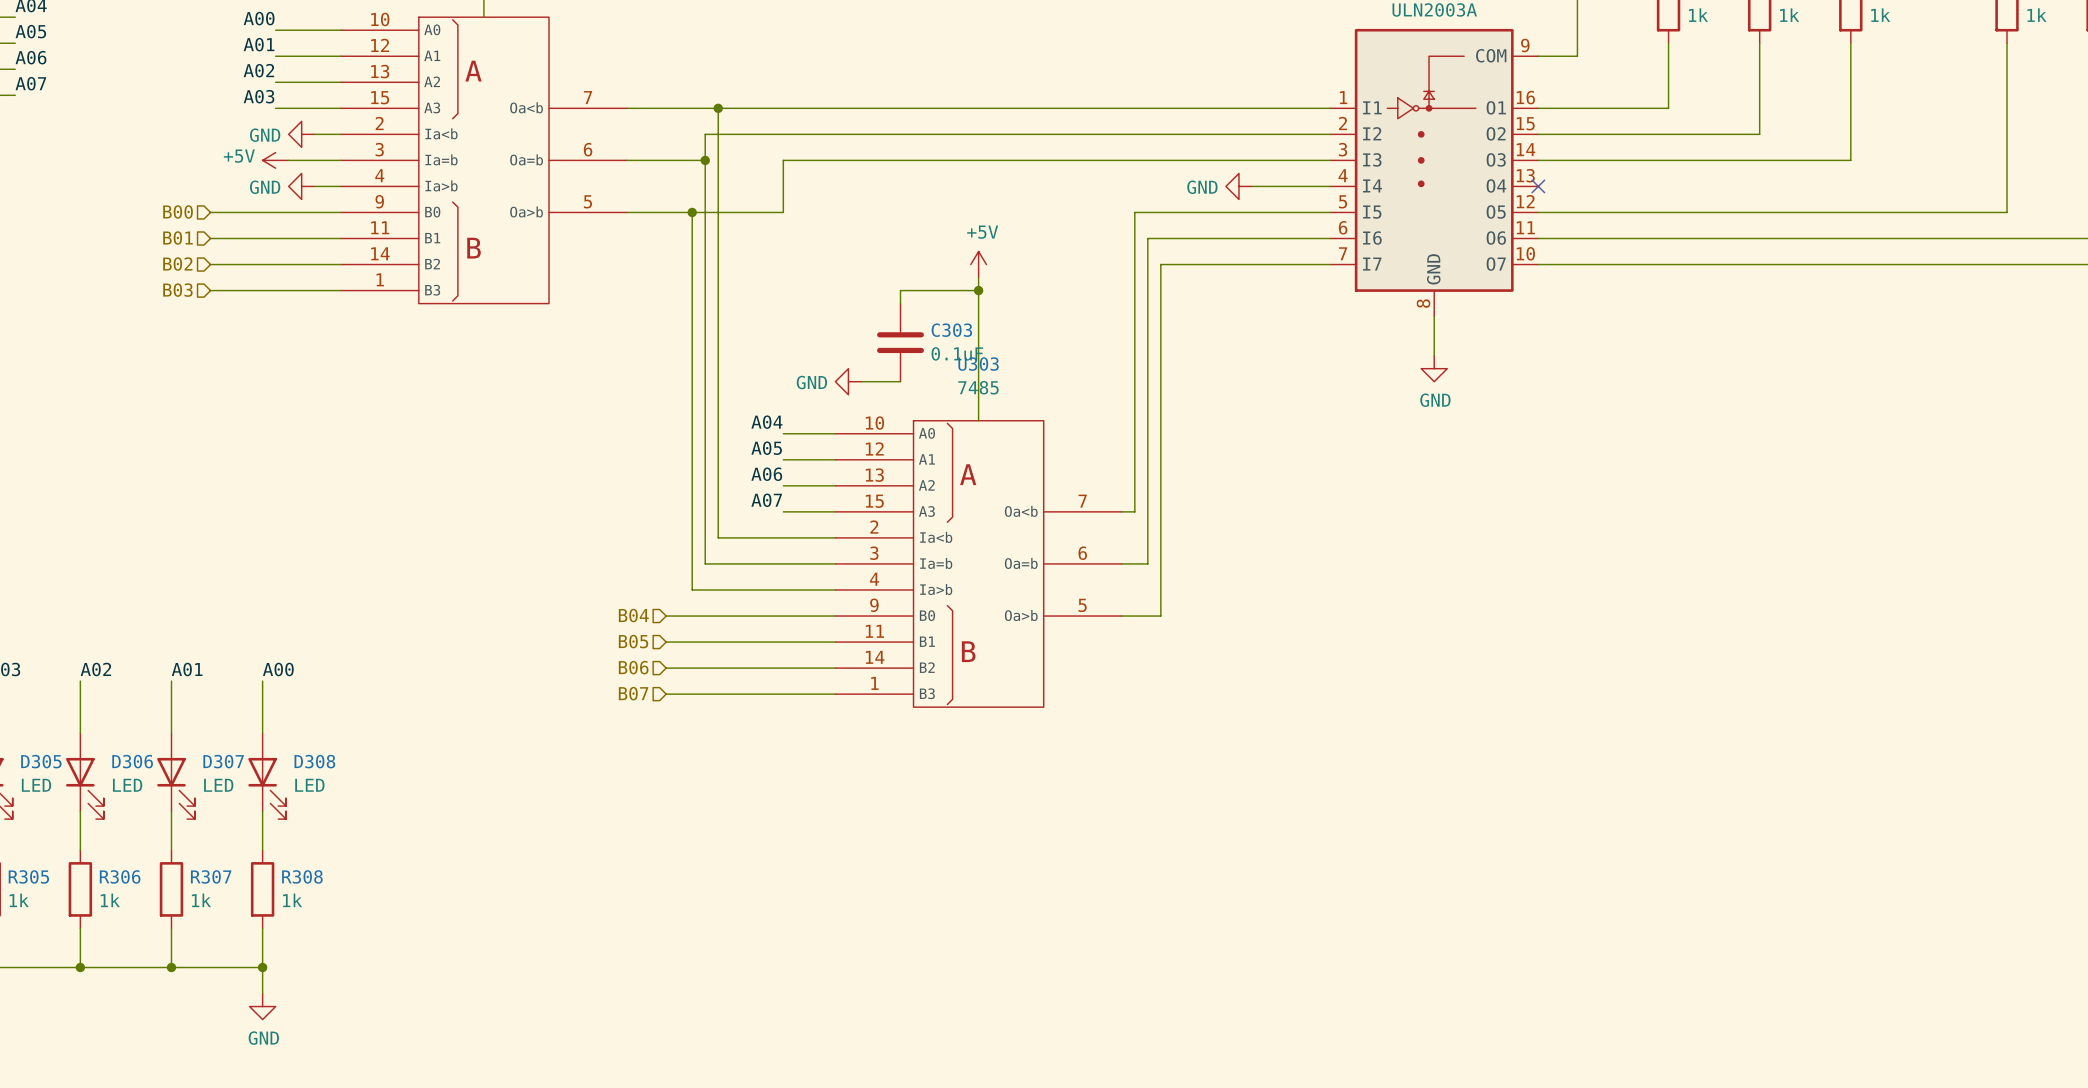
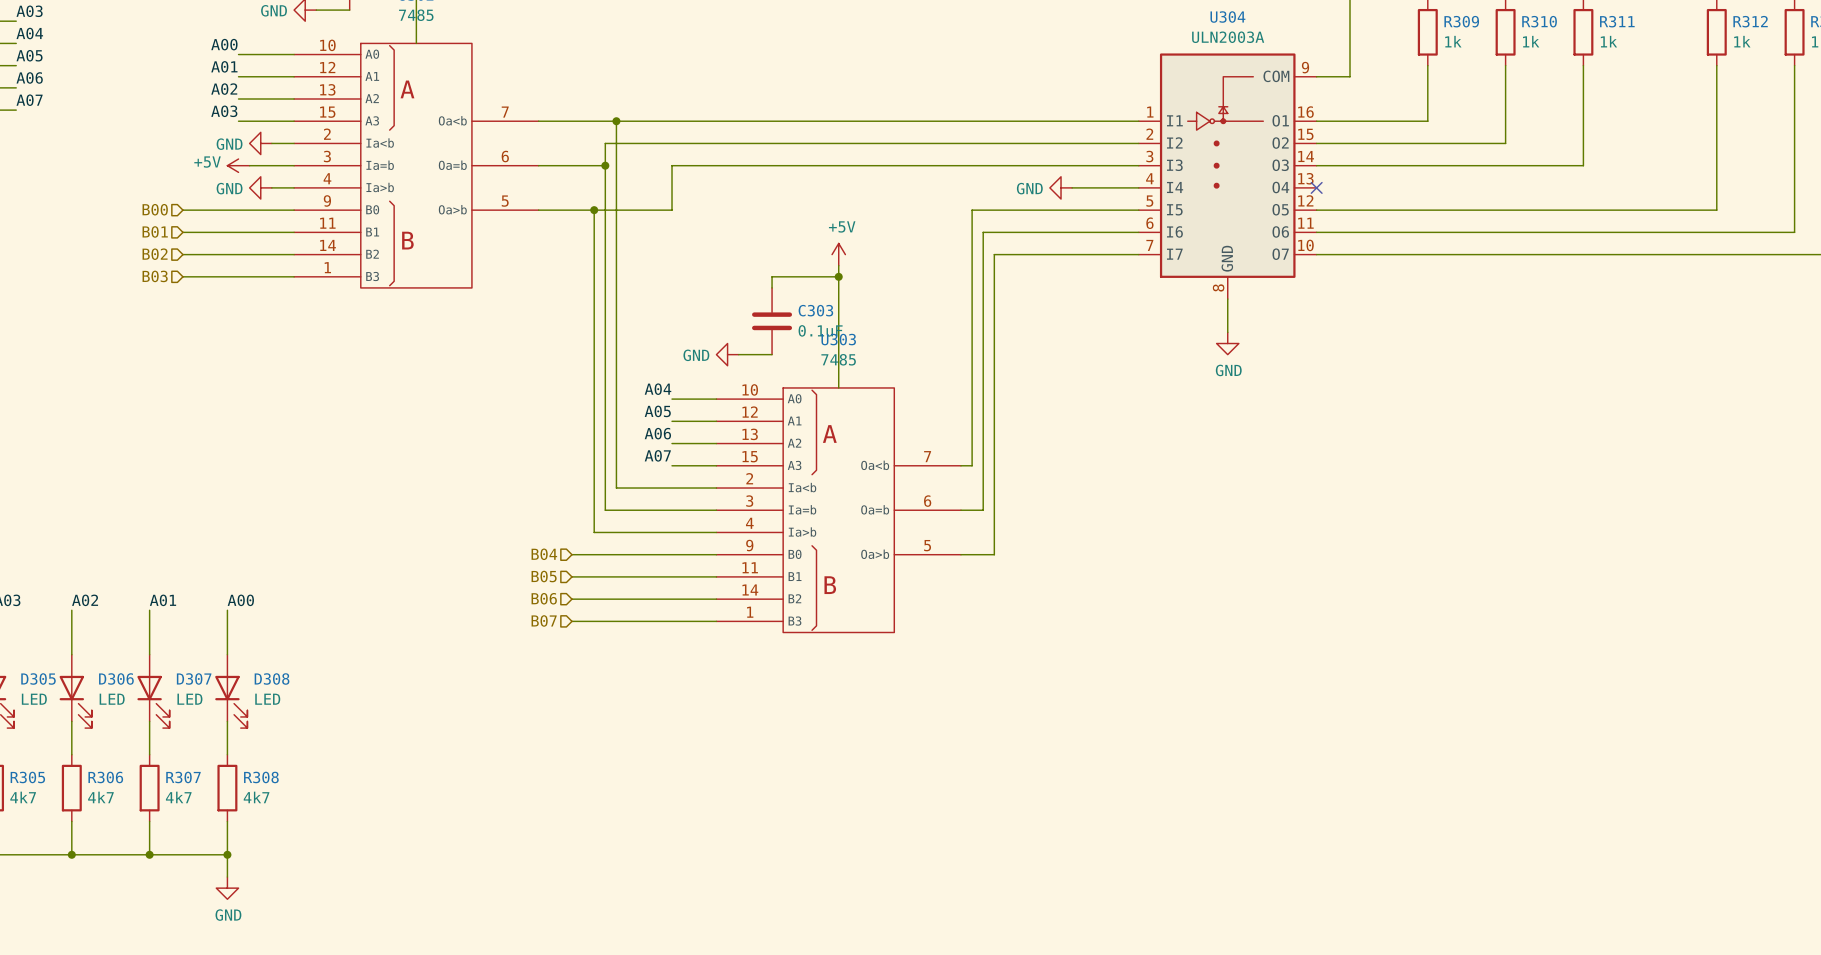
R305 value: 1k (19, 900) -> 4k7 (23, 797)
R306 value: 1k (110, 900) -> 4k7 (100, 797)
R307 value: 1k (201, 900) -> 4k7 (178, 797)
R308 value: 1k (292, 900) -> 4k7 (256, 797)

